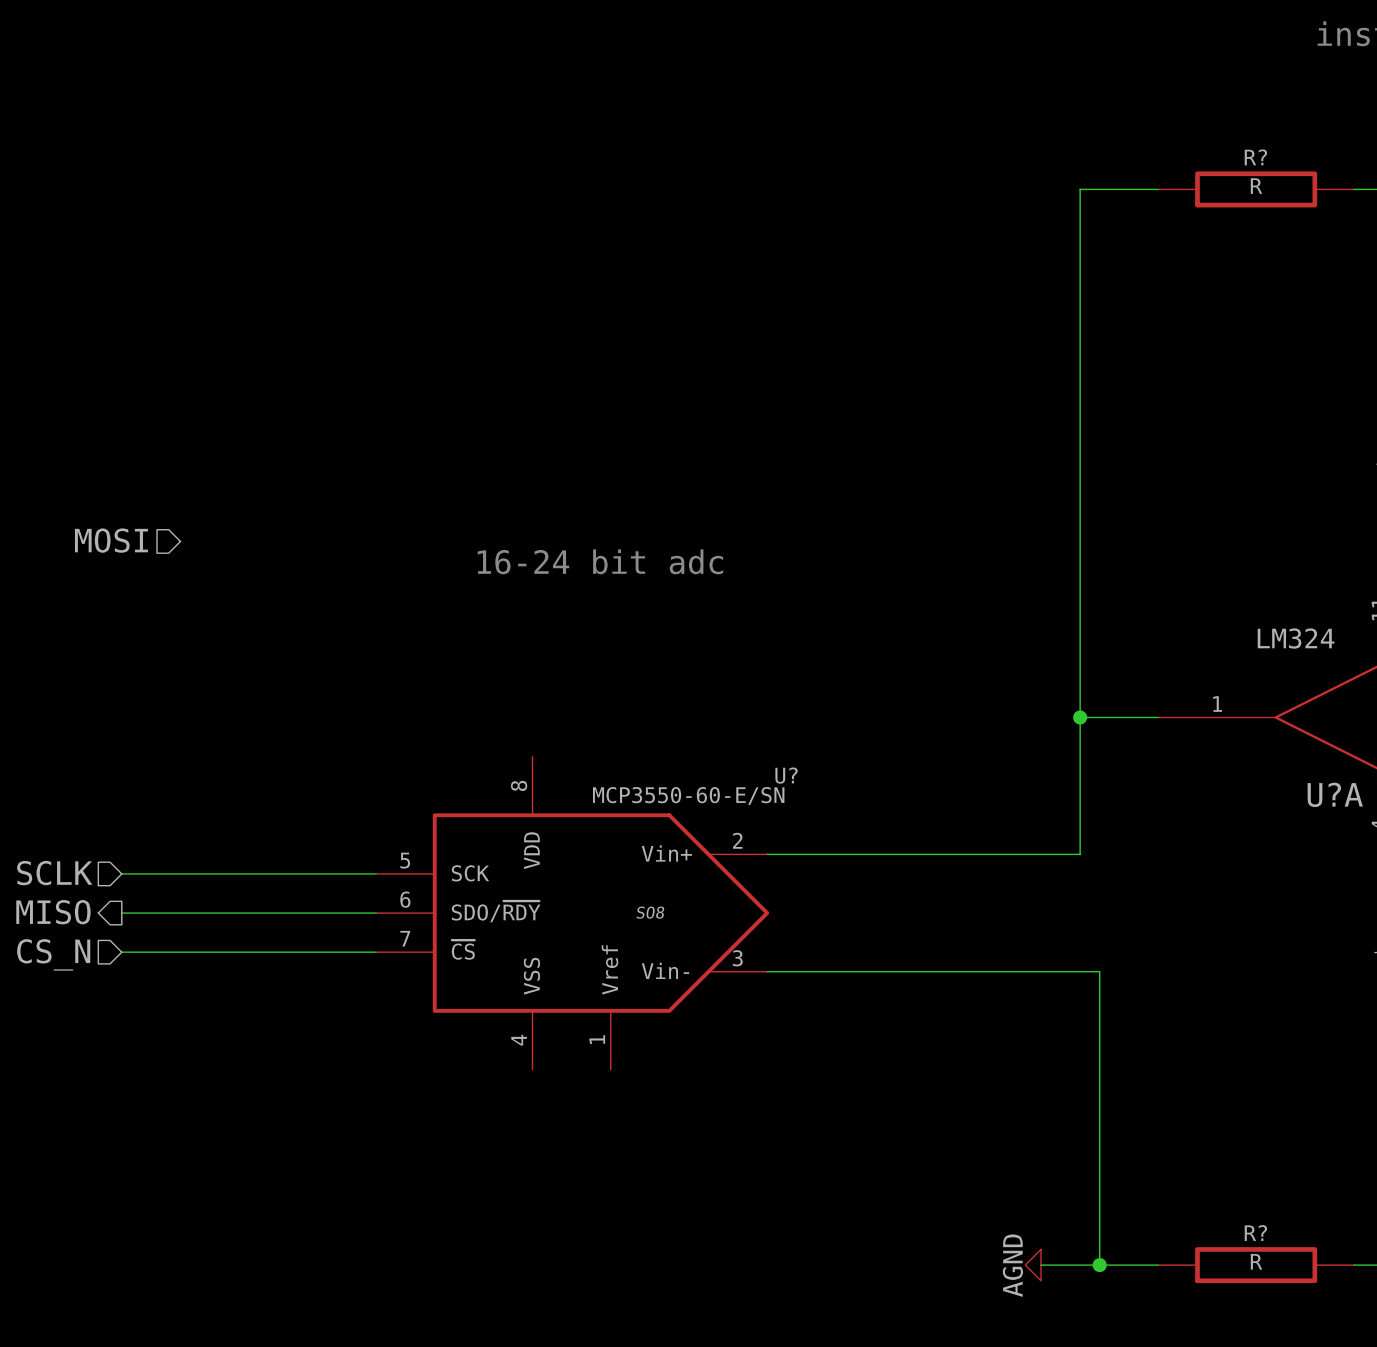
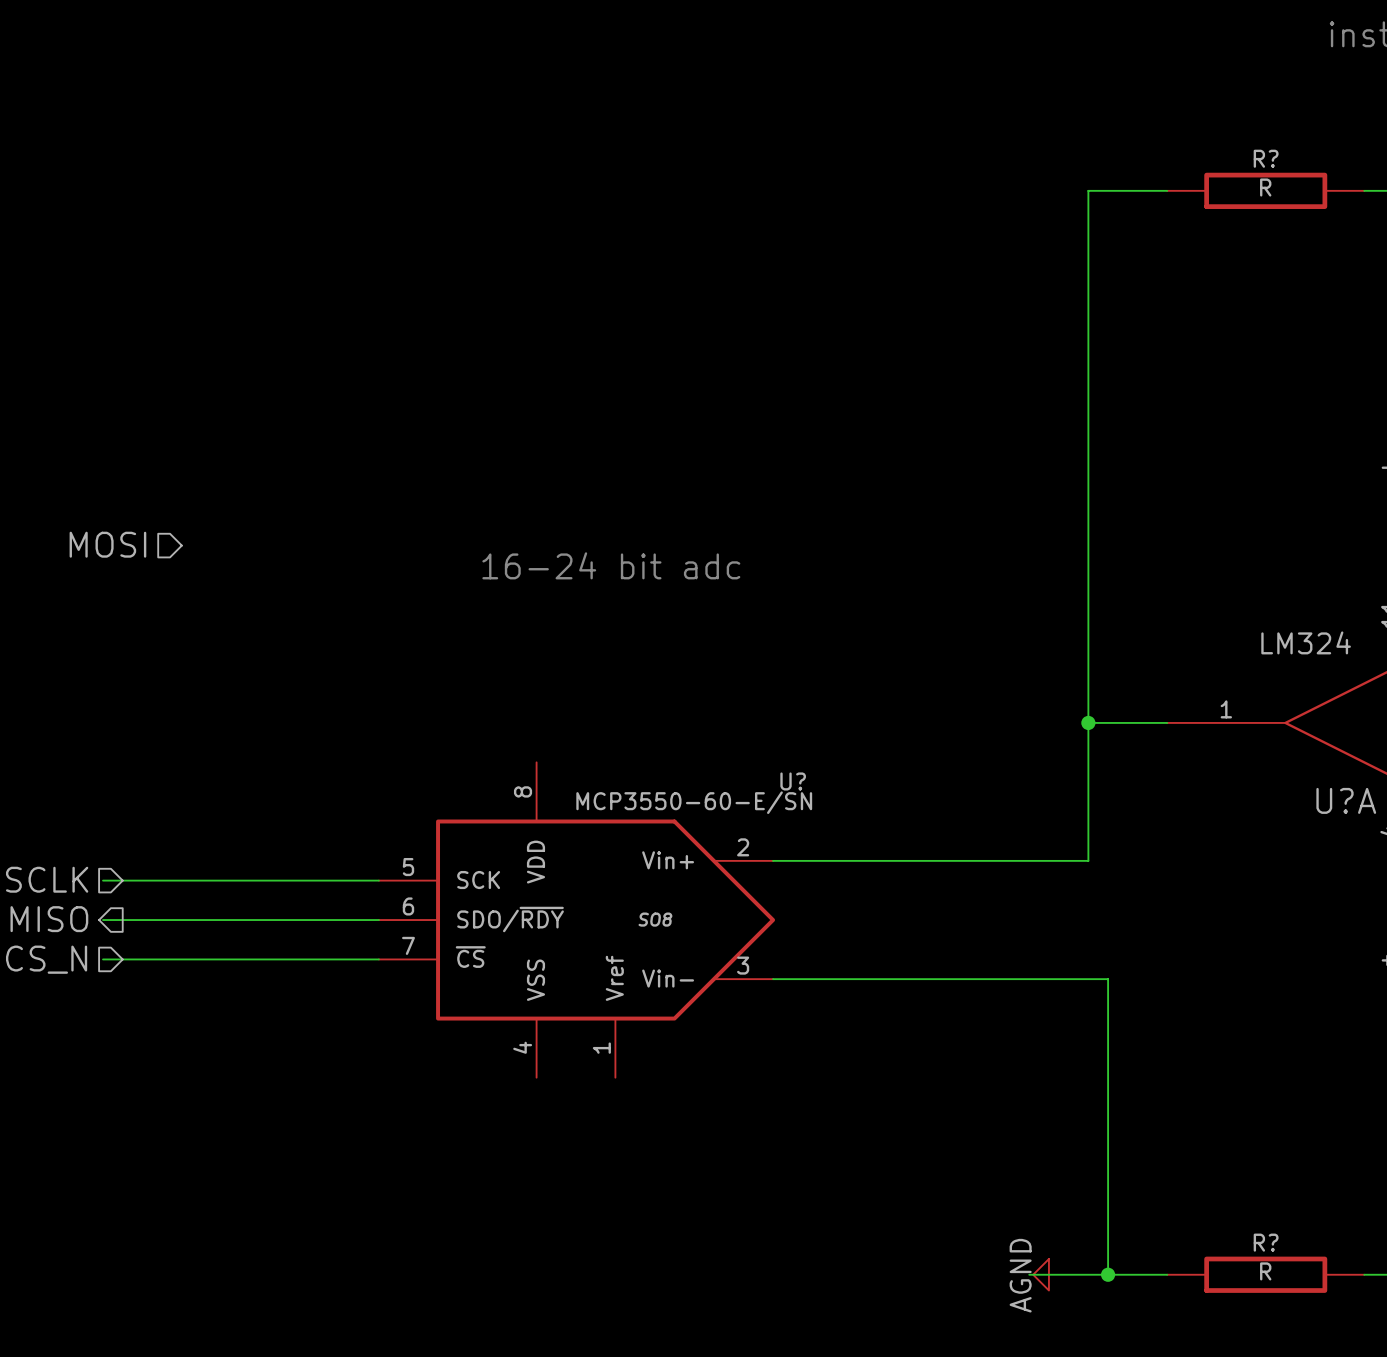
wire: none -> (103, 880) (122, 880)
wire: none -> (103, 920) (122, 920)
wire: none -> (103, 959) (122, 959)
wire: none -> (1029, 1274) (1048, 1274)

